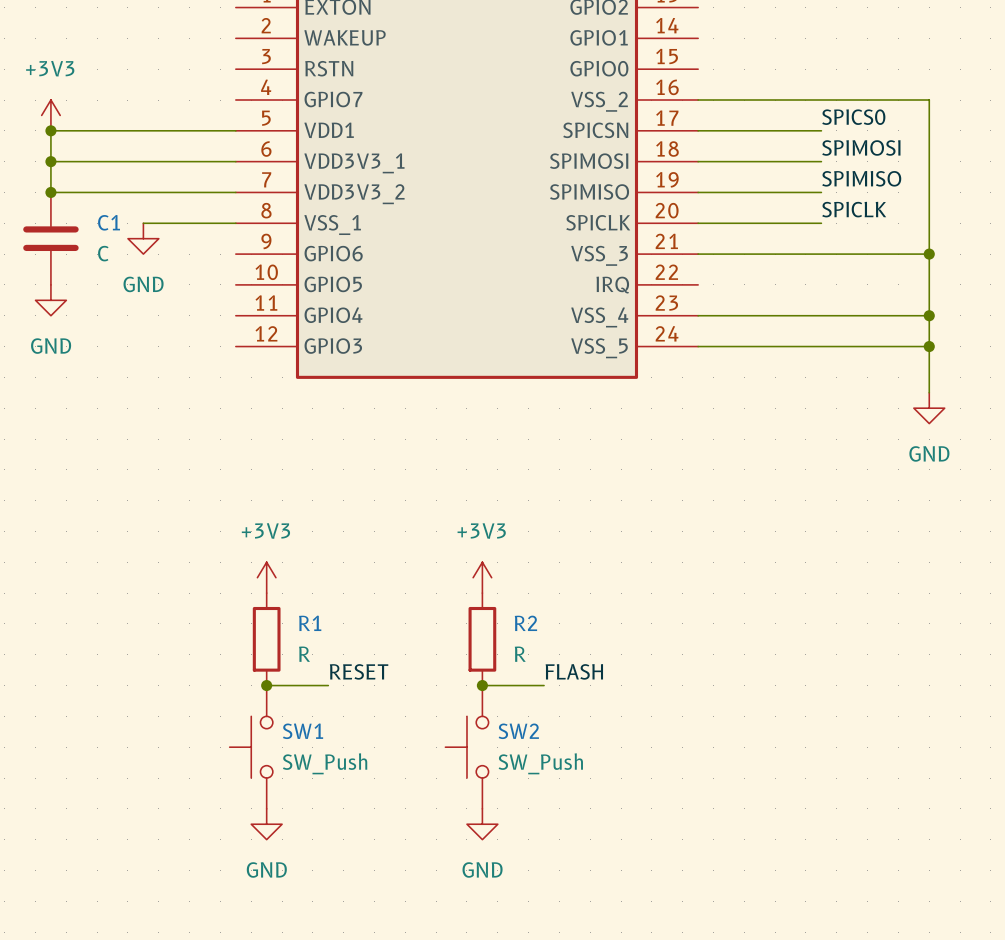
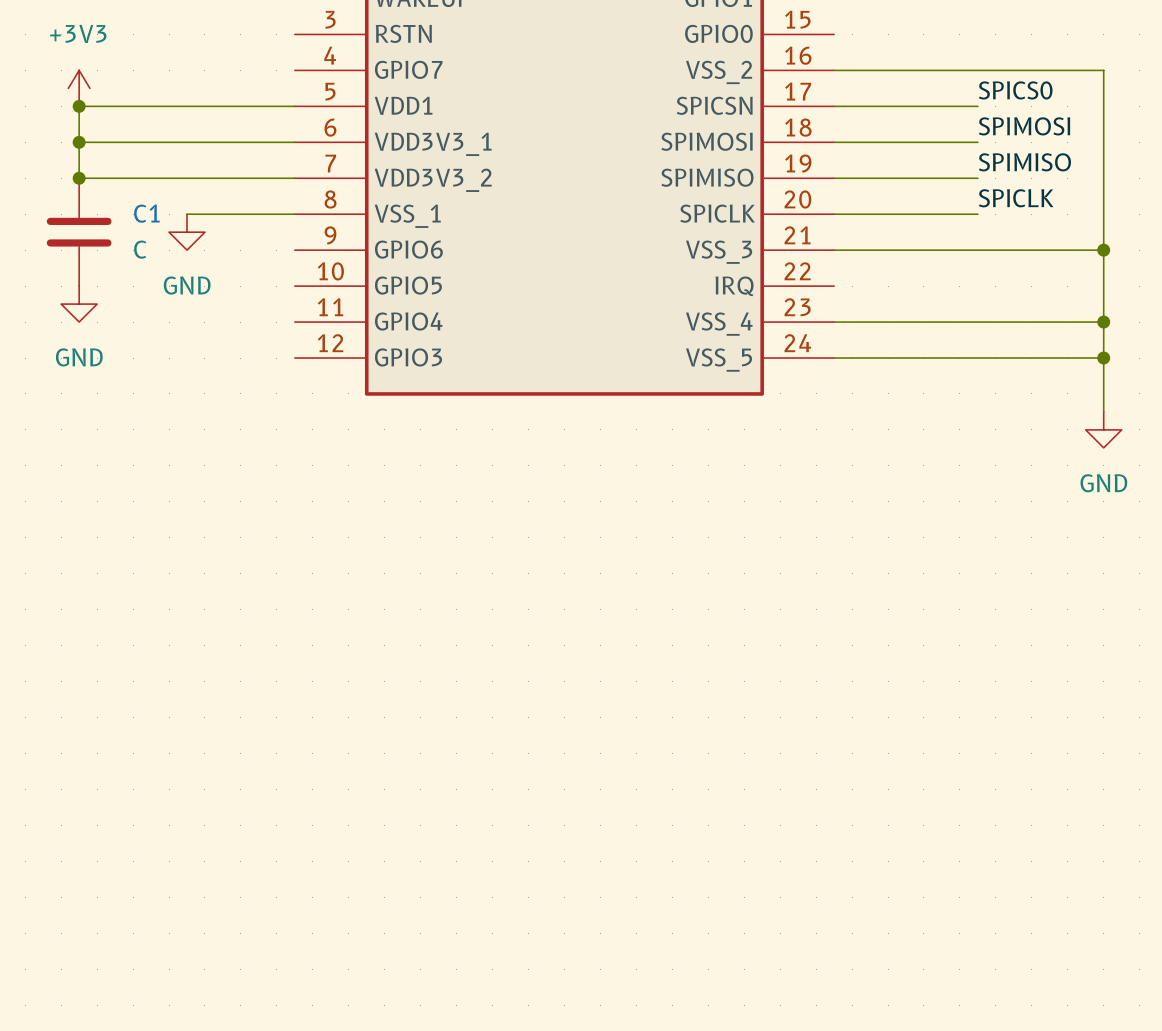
power symbol: +3V3 (266, 577) -> none
power symbol: +3V3 (482, 577) -> none
R1: R (266, 639) -> none
R2: R (482, 639) -> none
label: RESET (359, 671) -> none
label: FLASH (574, 671) -> none
wire: (266, 685) (328, 685) -> none
junction: (266, 685) -> none
wire: (482, 685) (544, 685) -> none
junction: (482, 685) -> none
SW1: SW_Push (251, 747) -> none
SW2: SW_Push (466, 747) -> none
power symbol: GND (266, 824) -> none
power symbol: GND (482, 824) -> none

